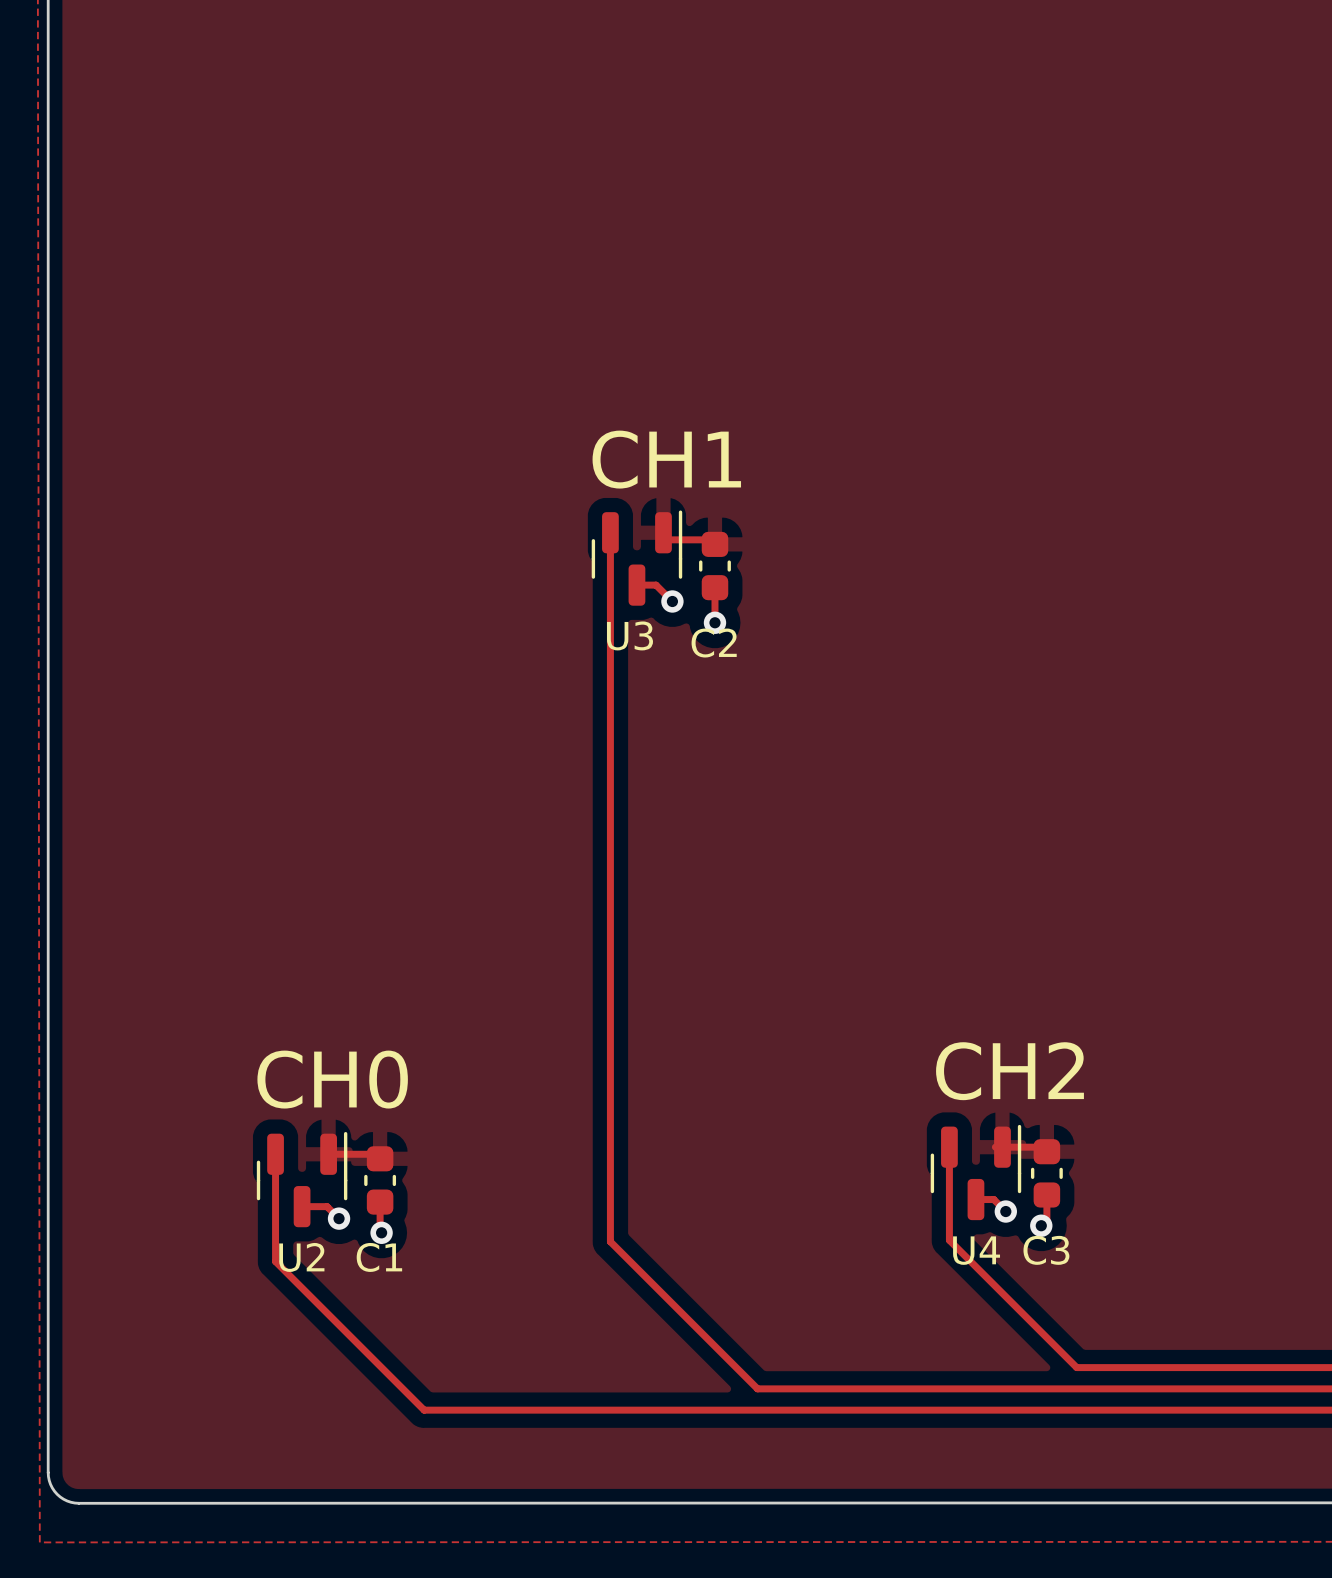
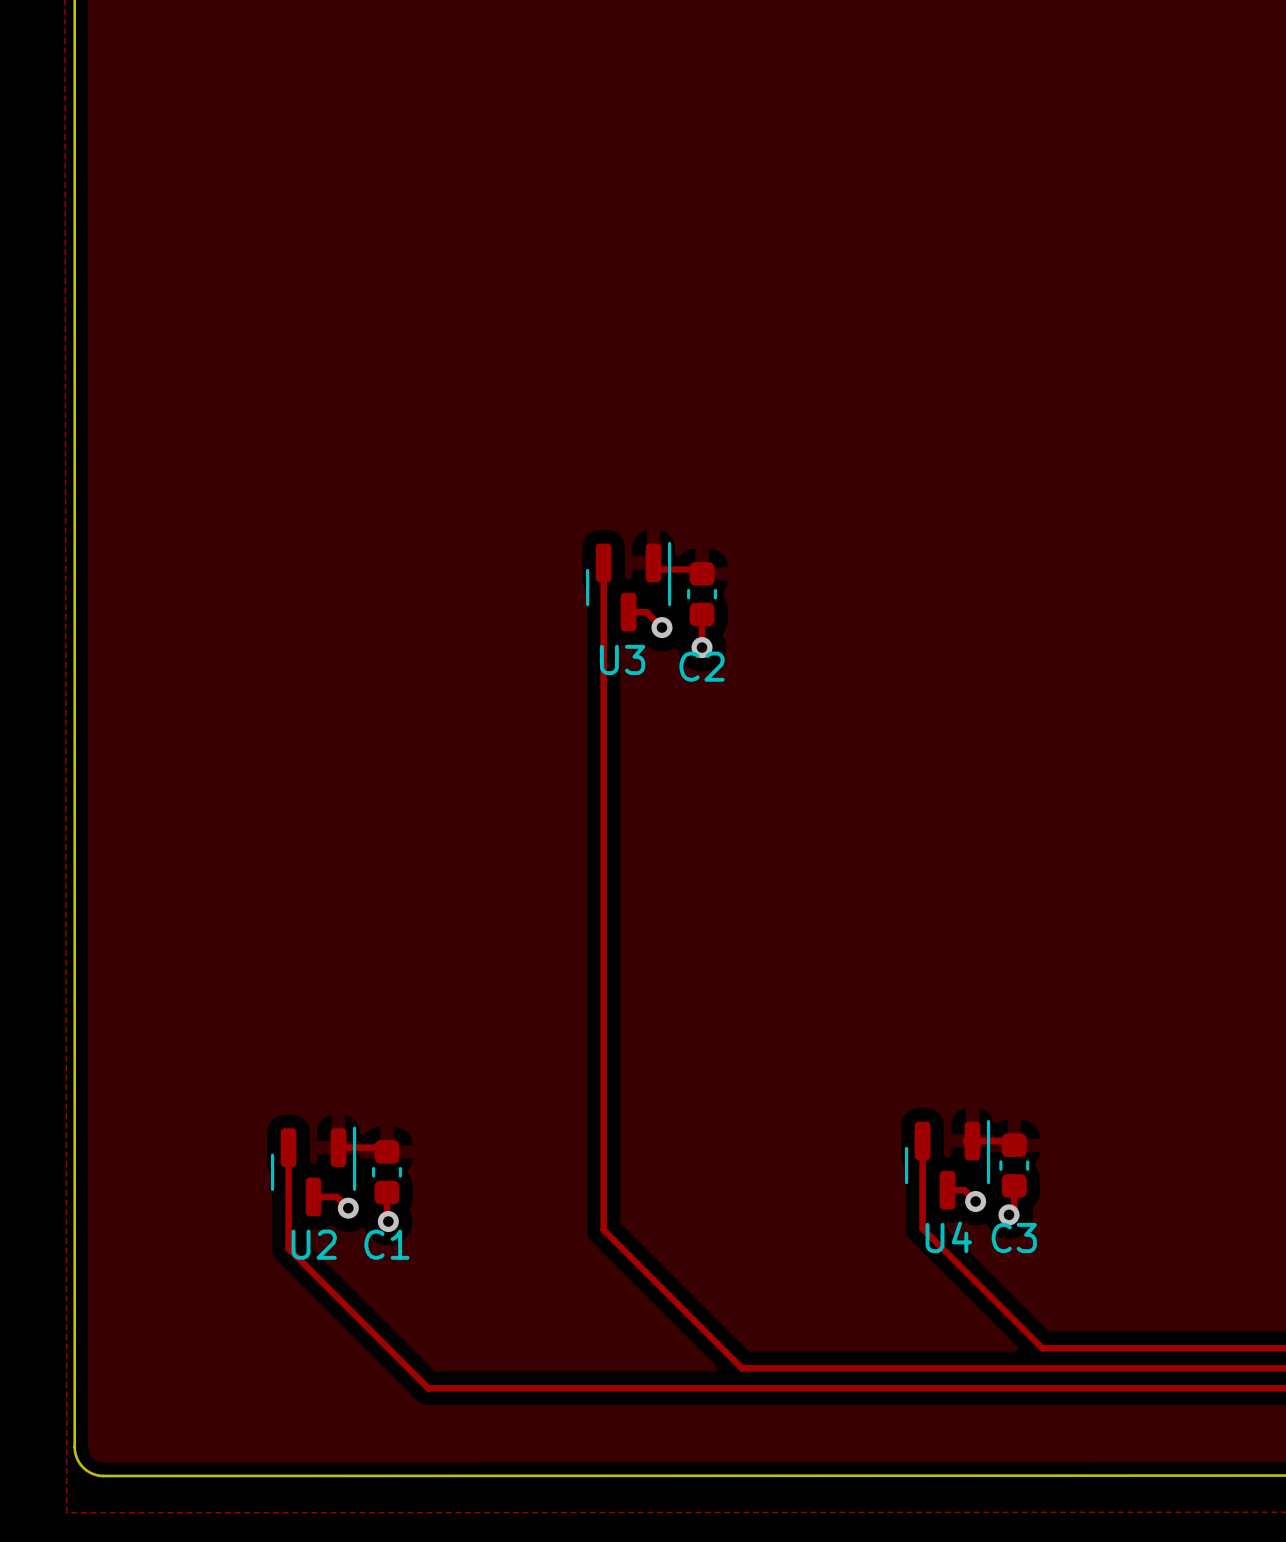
text: CH1 (666, 459) -> none
text: CH2 (1010, 1071) -> none
text: CH0 (332, 1079) -> none

